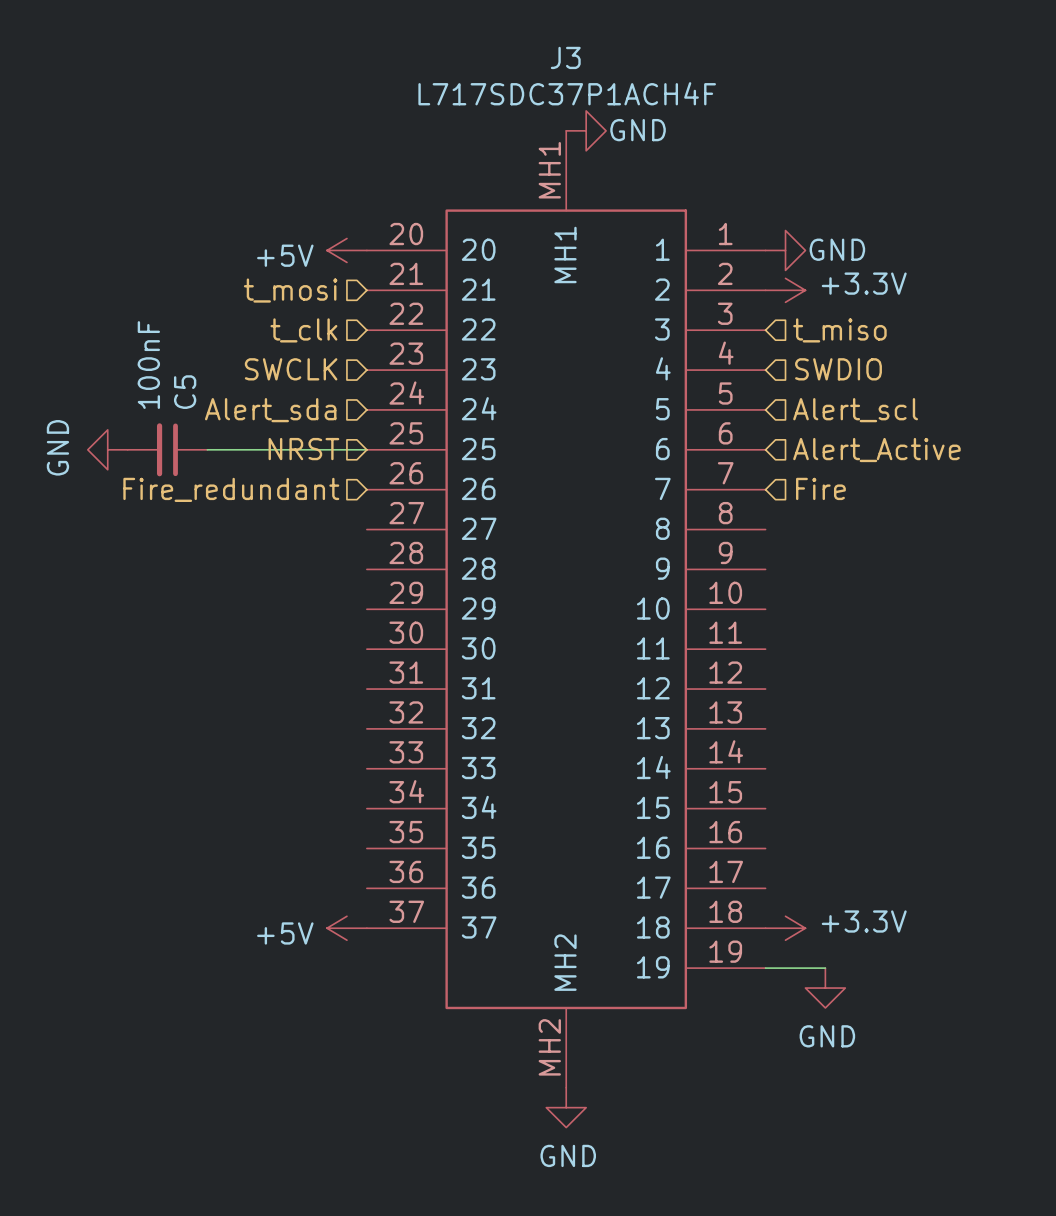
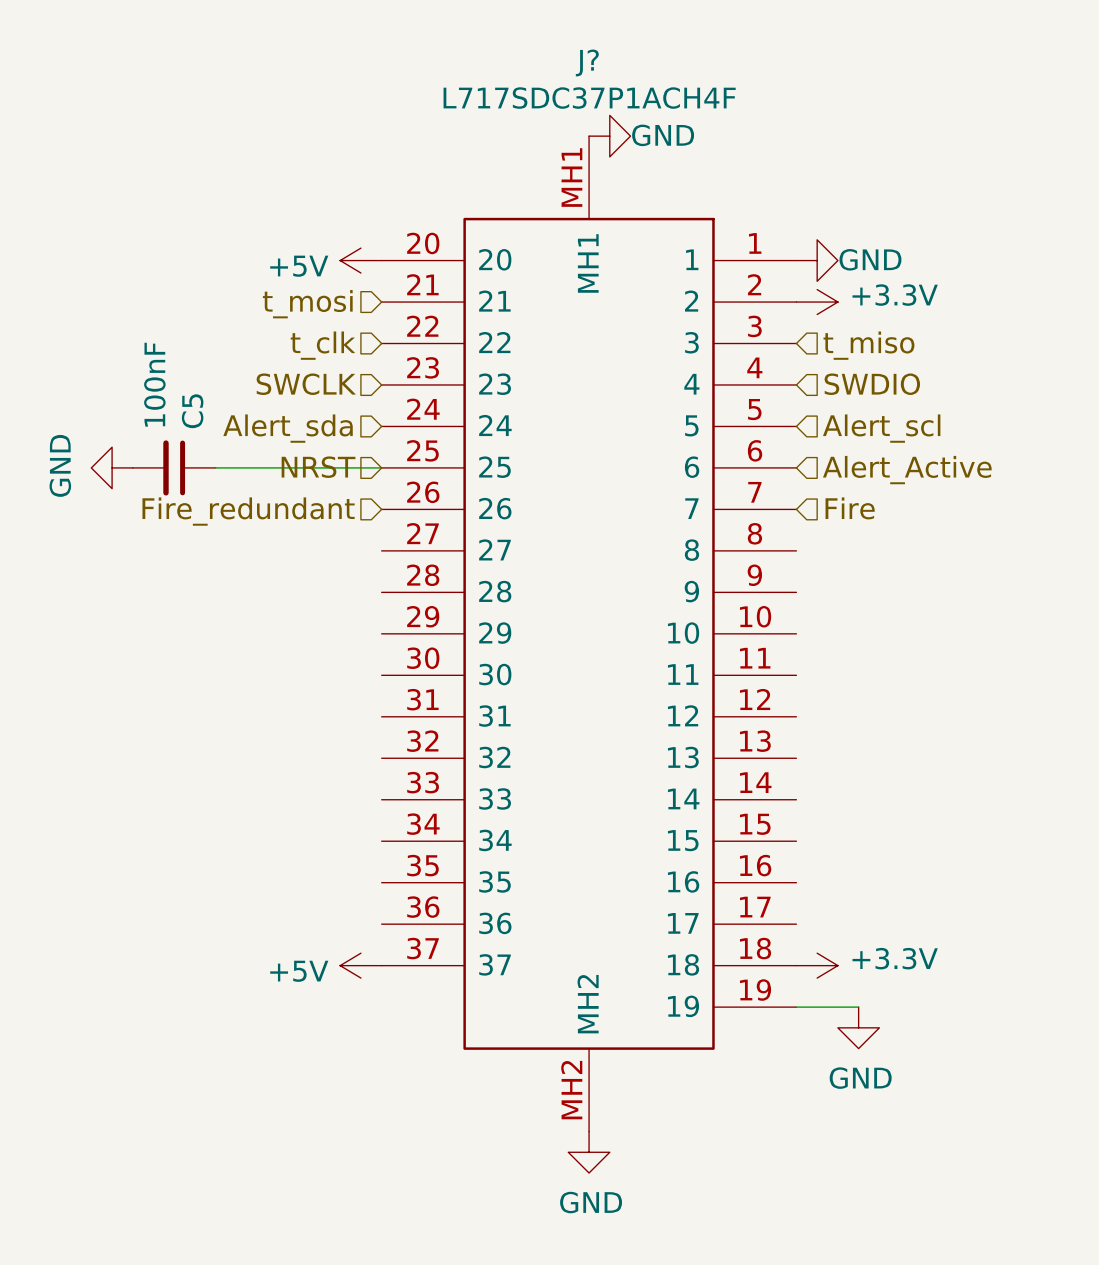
J3 name: J3 (565, 57) -> J? (587, 62)

